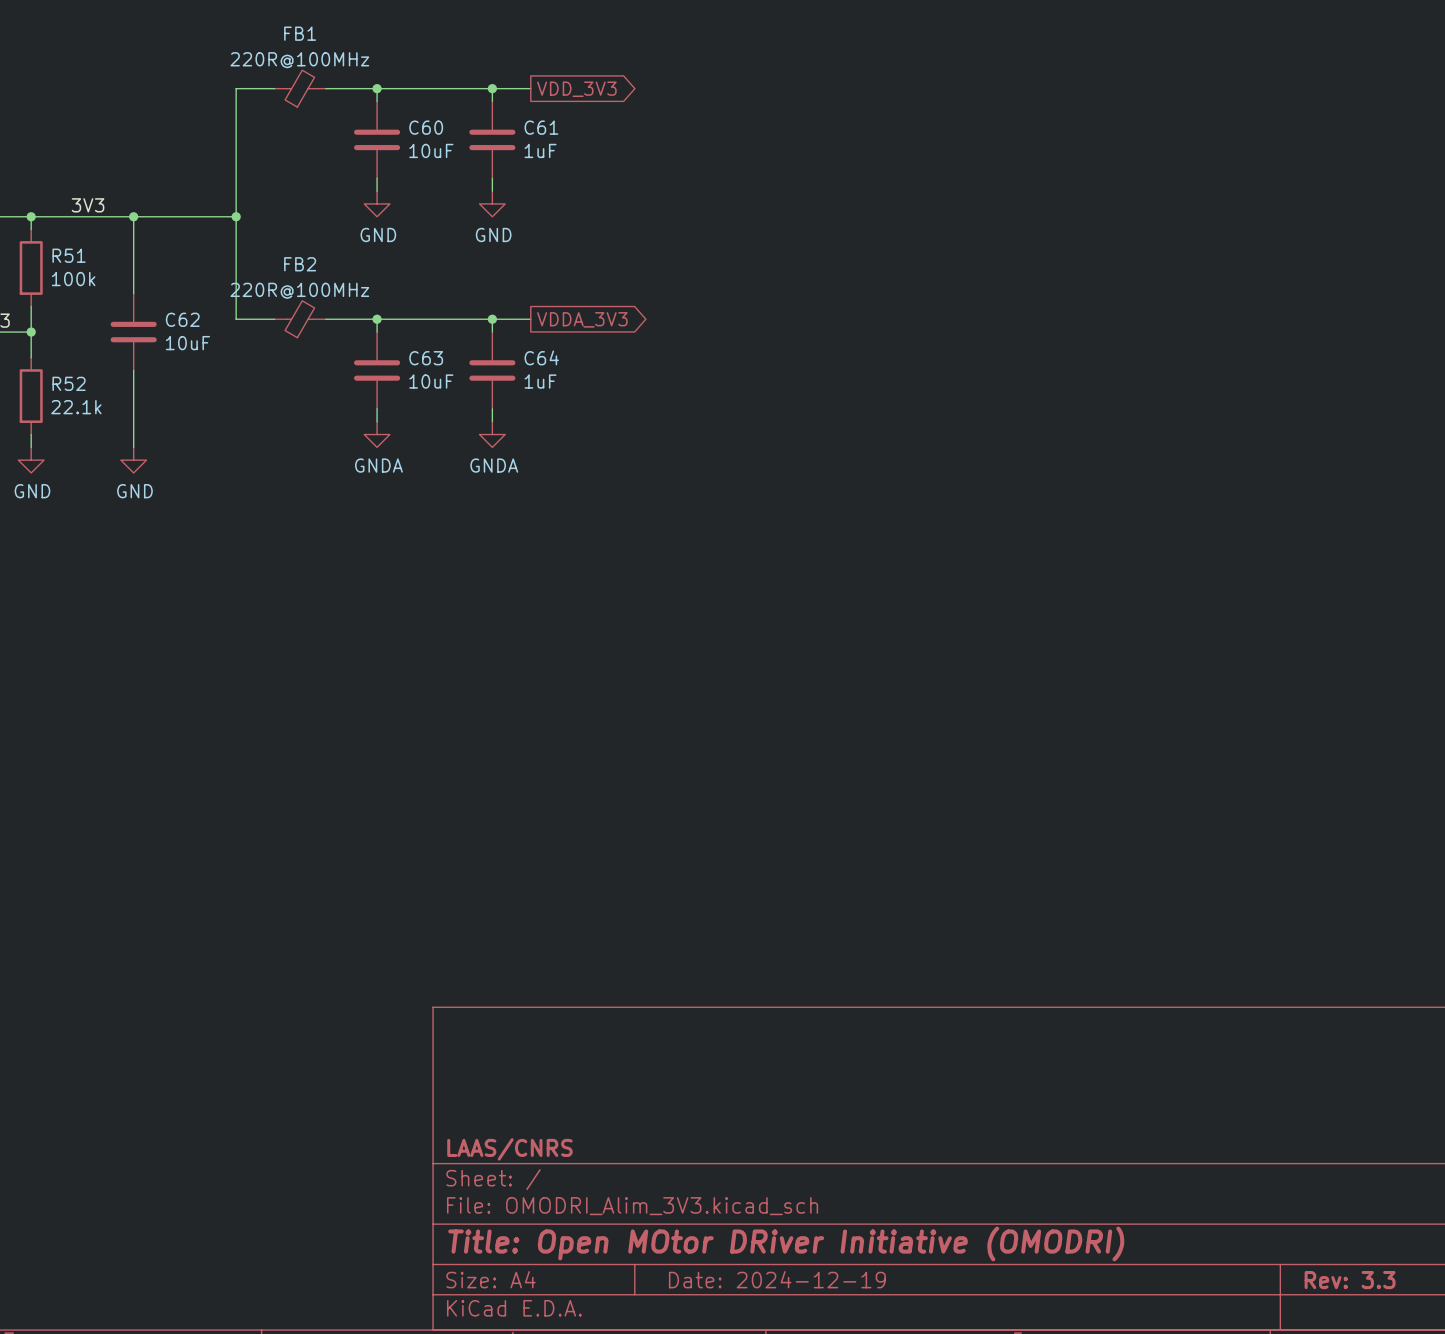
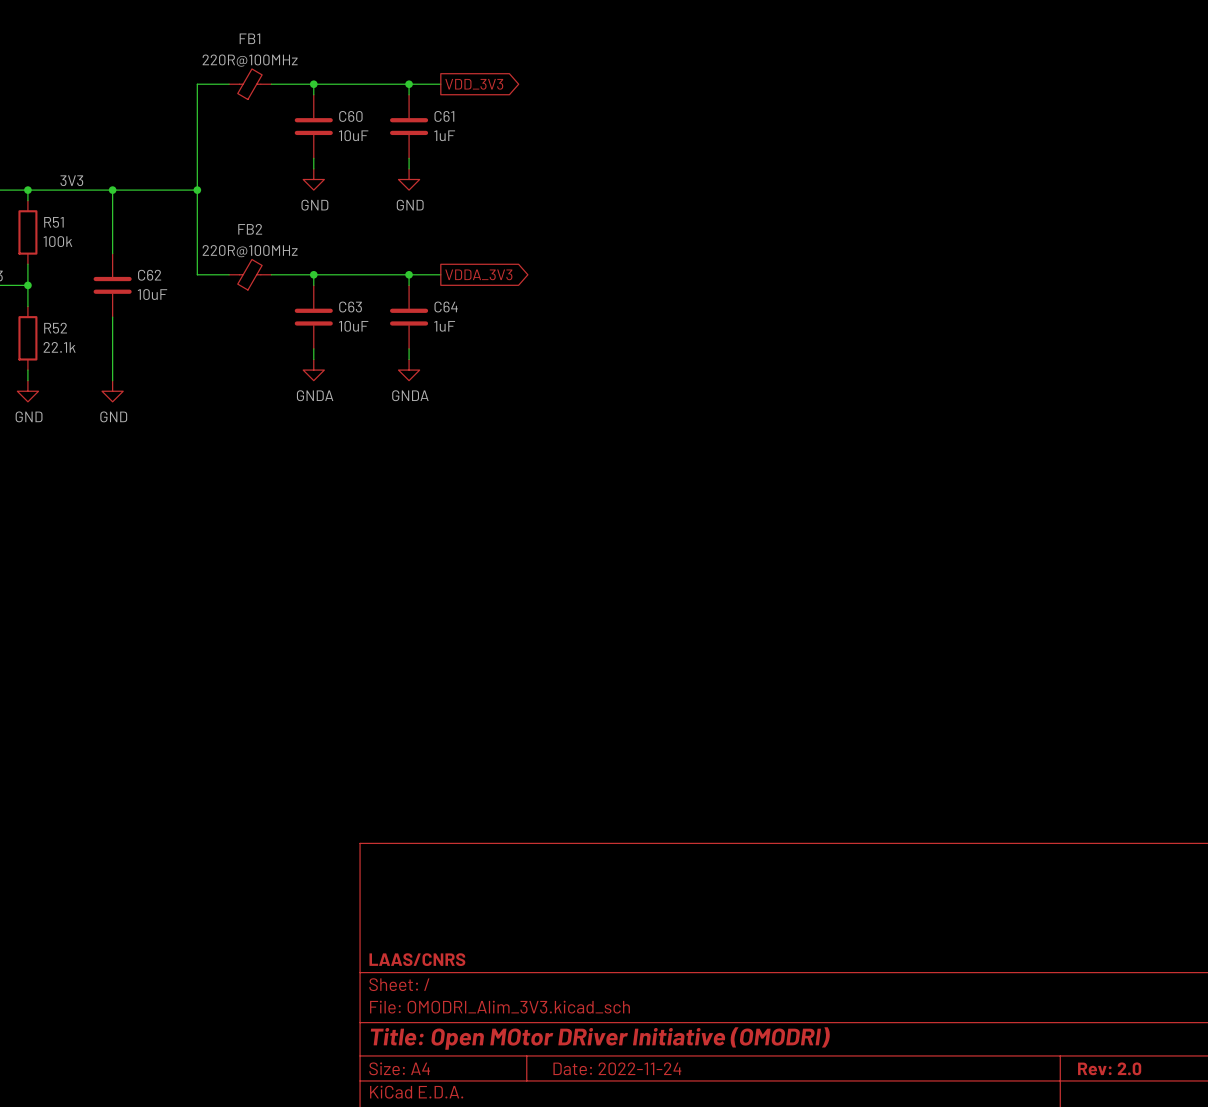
title block: Date: 2024-12-19 (777, 1279) -> Date: 2022-11-24 (617, 1068)
title block: Rev: 3.3 (1350, 1280) -> Rev: 2.0 (1109, 1068)

